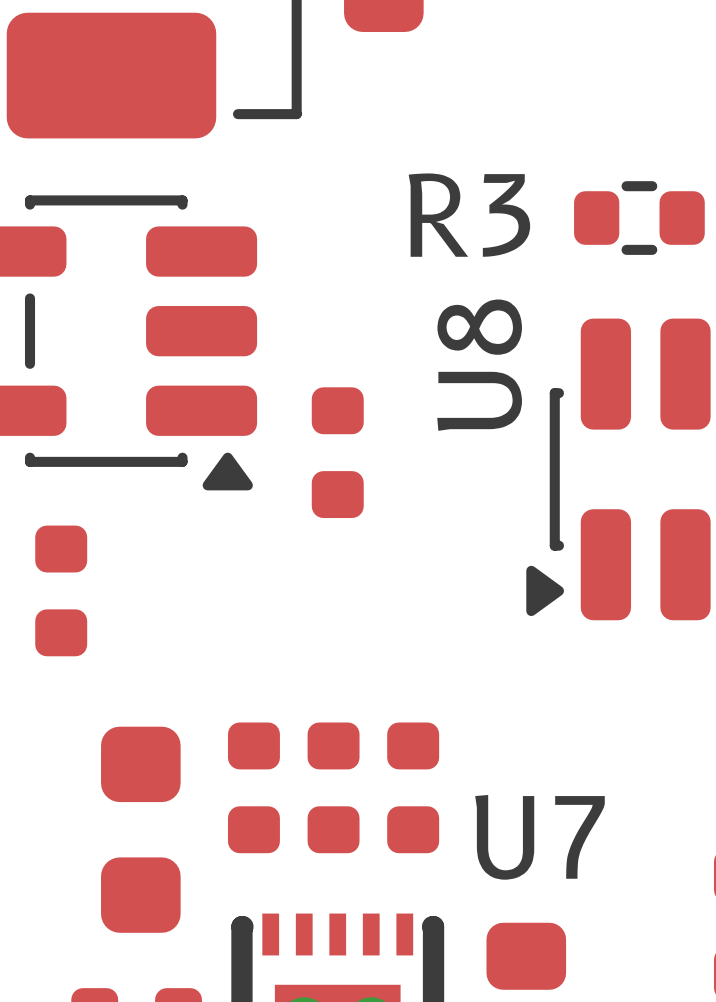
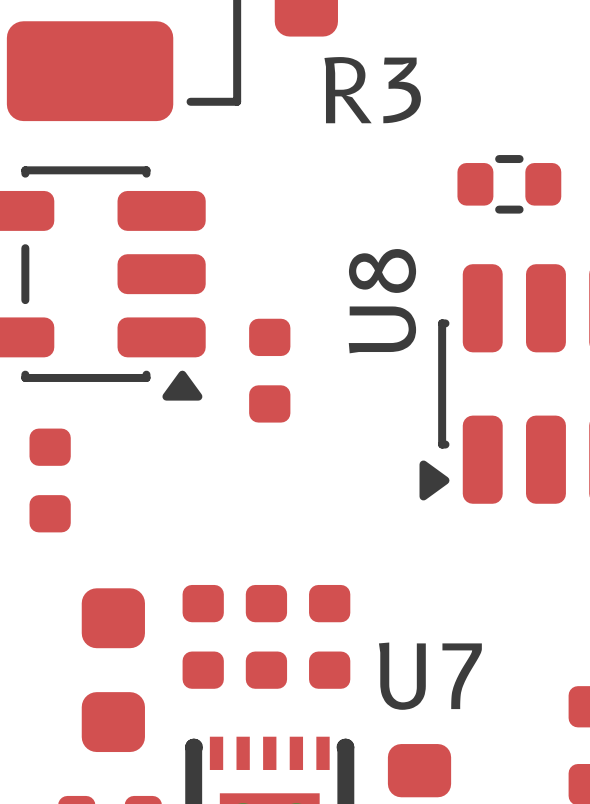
R3 name position: R3 (469, 215) -> R3 (372, 90)

